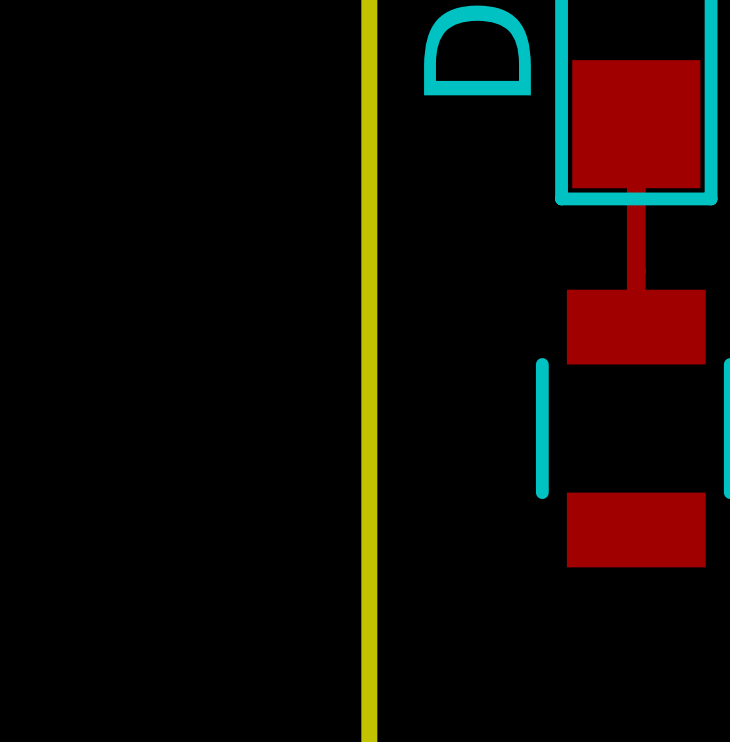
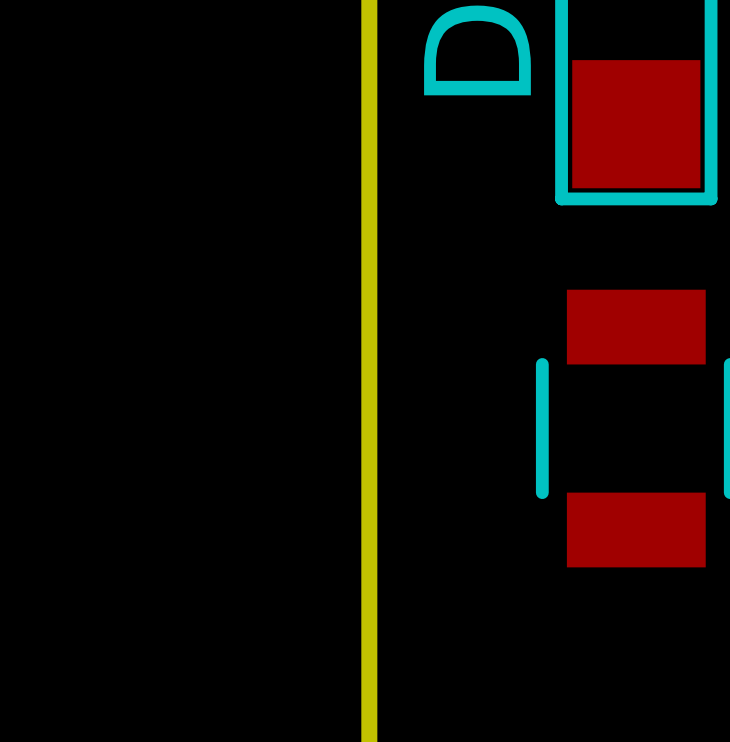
track: (636, 124) (636, 327) -> none

